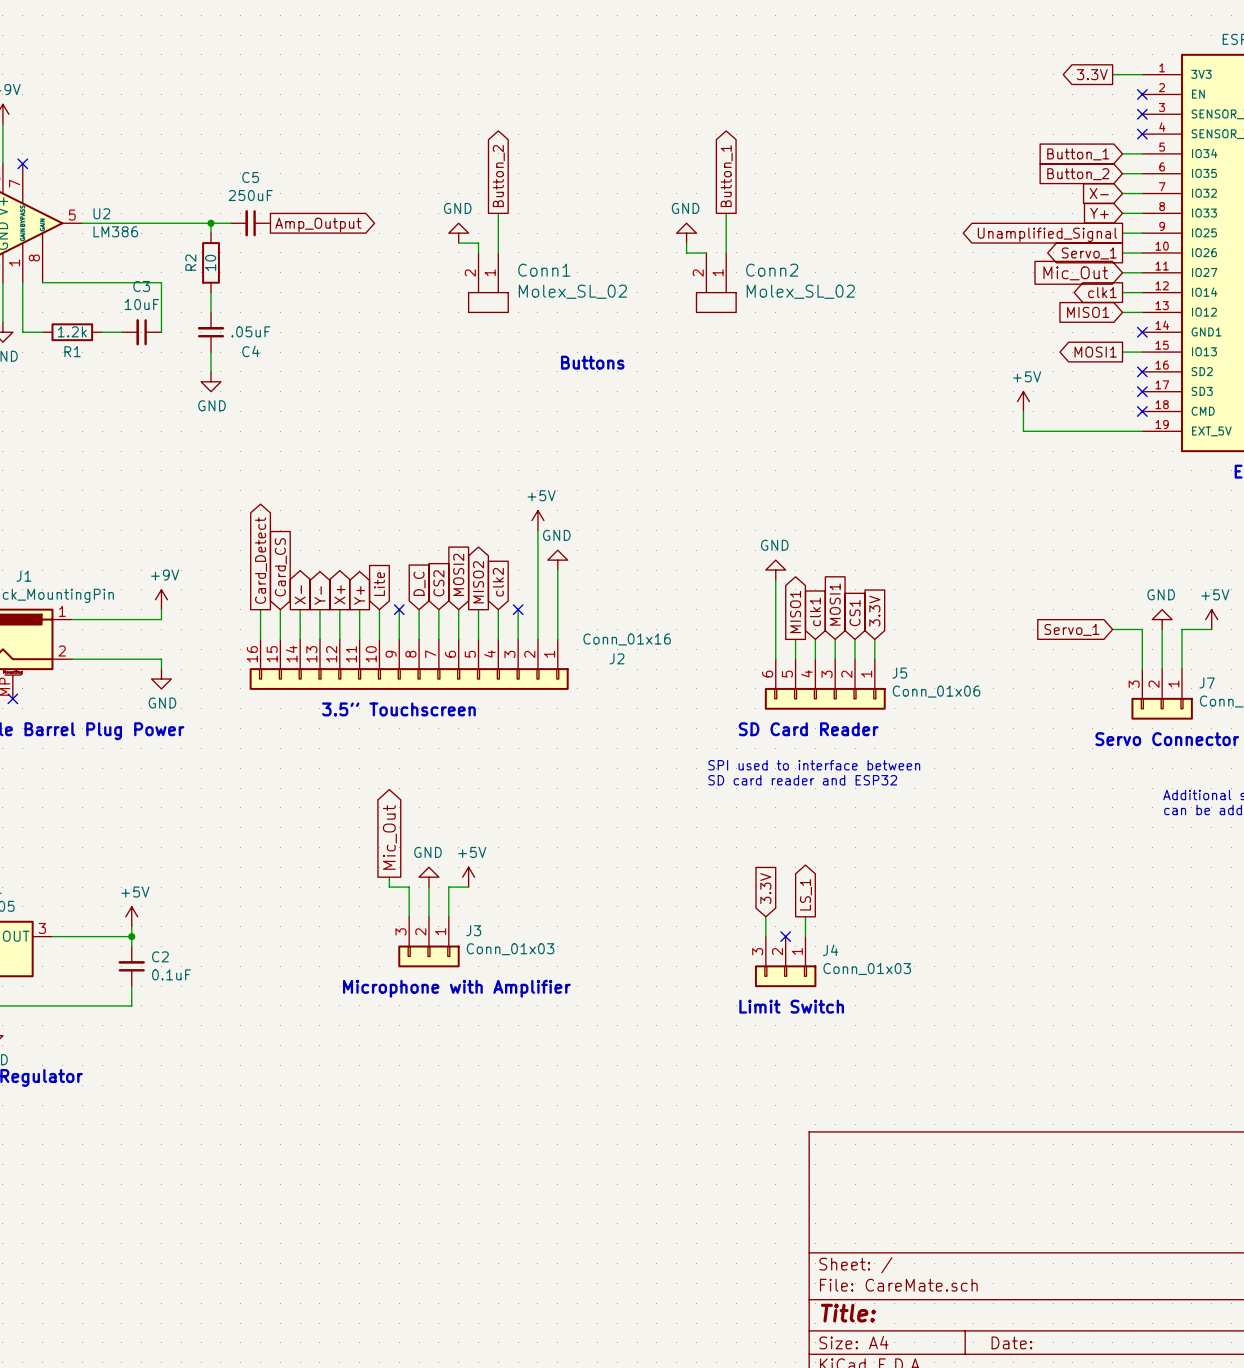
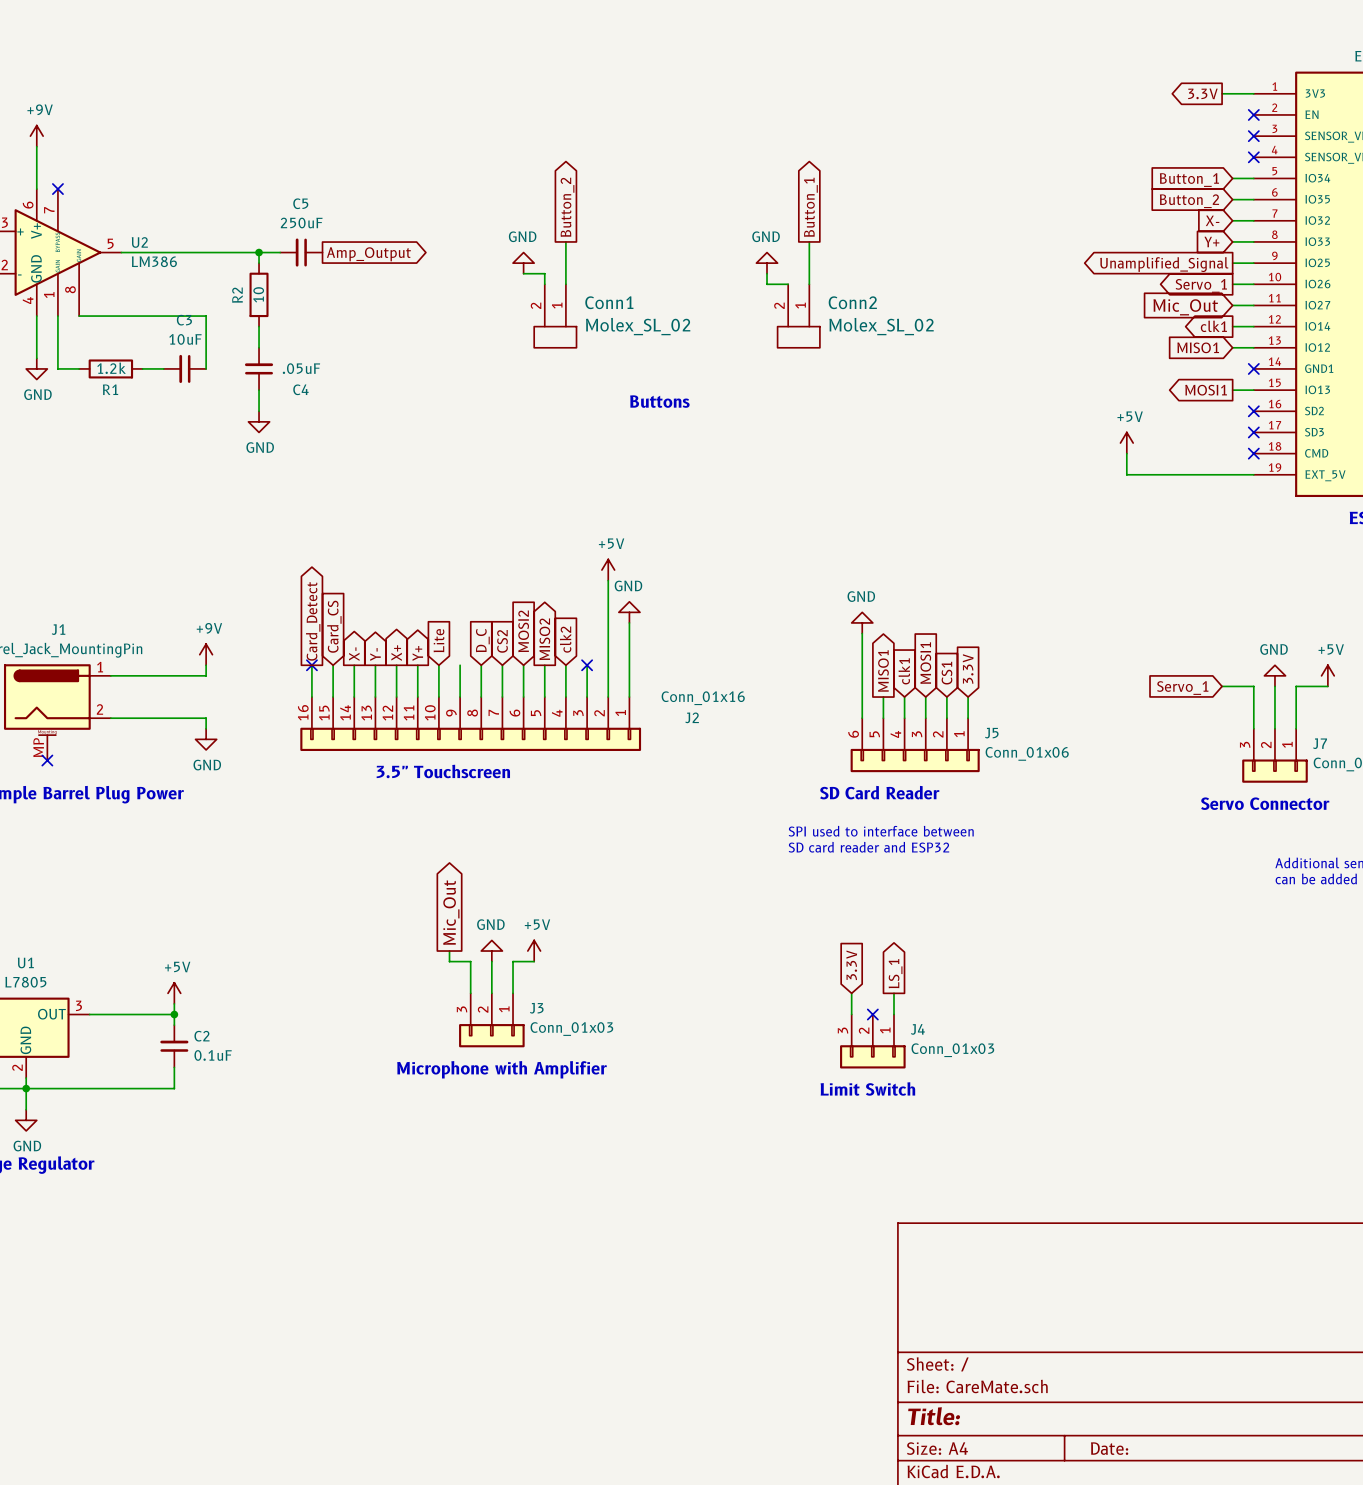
no-connect mark: none -> (311, 665)
no-connect mark: (399, 609) -> none

